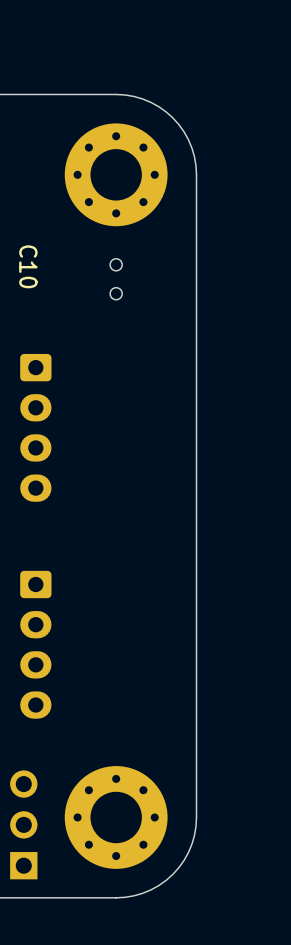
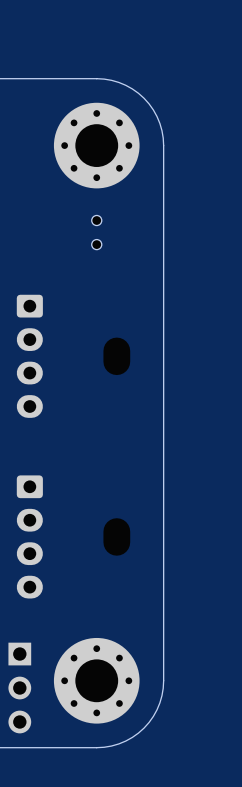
C10: (28, 266) -> none
part rotation: 0° (23, 824) -> 180° (19, 688)

